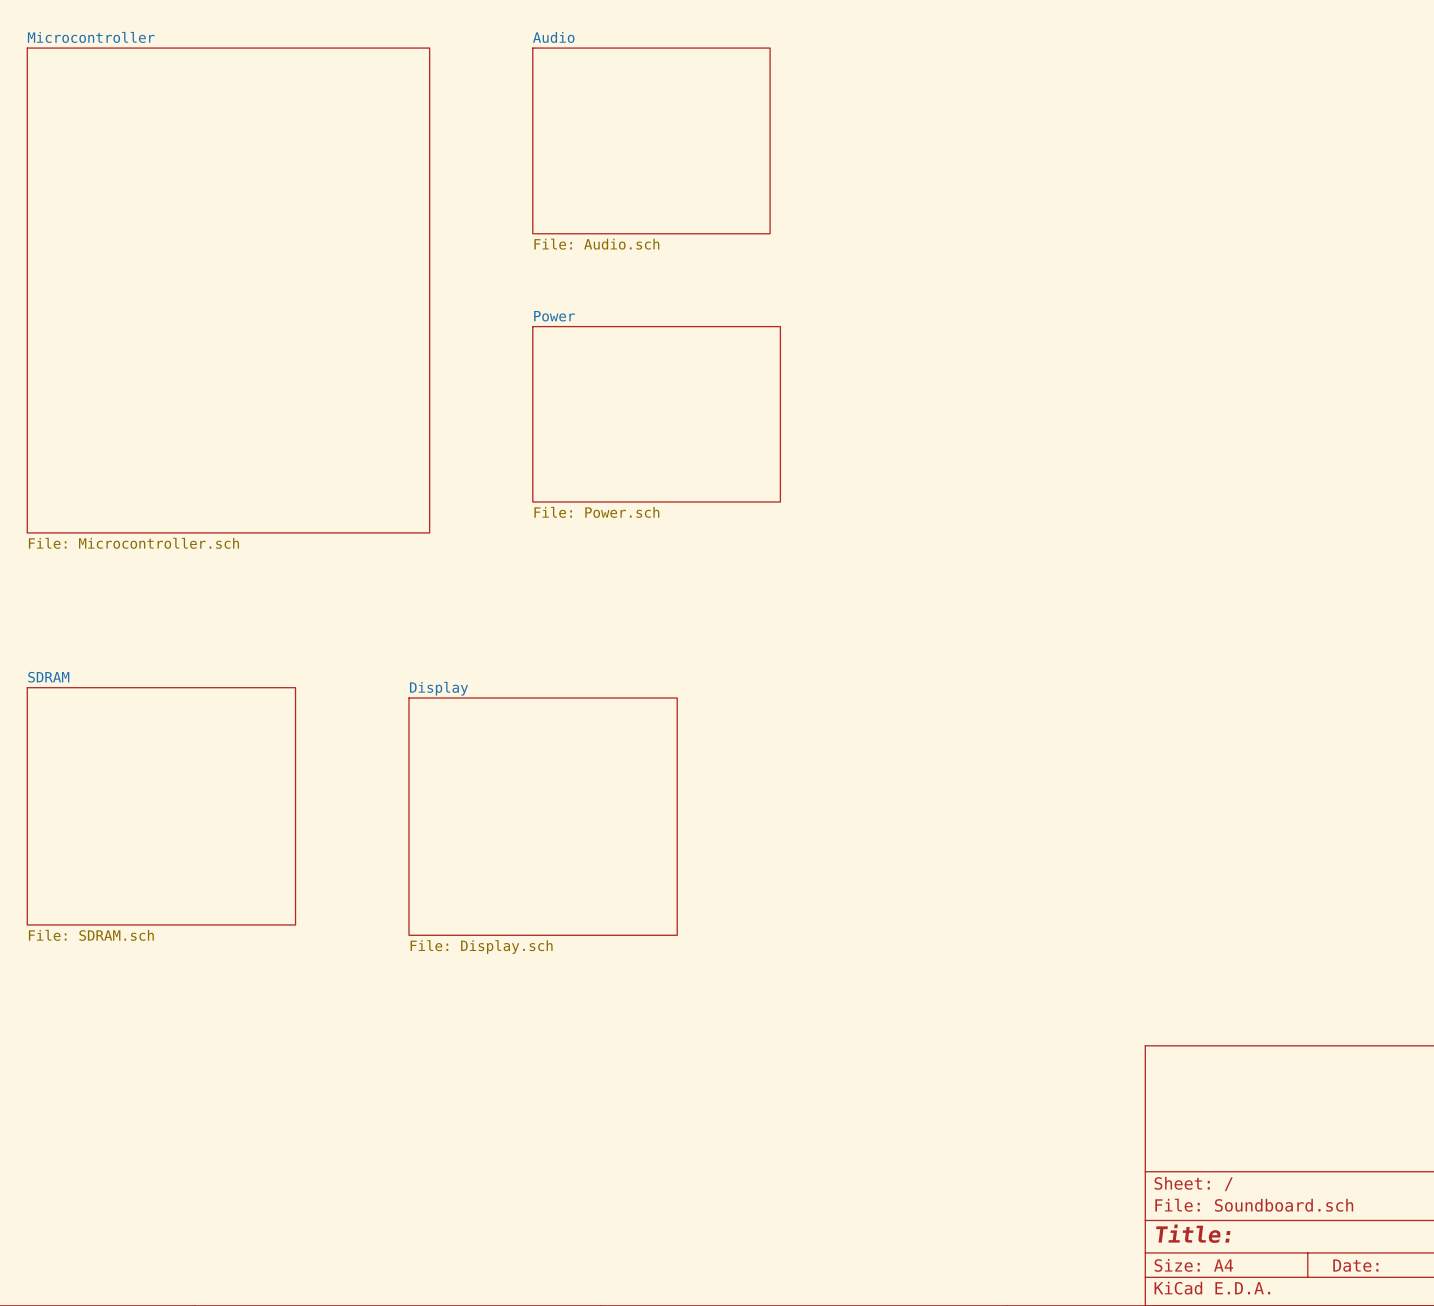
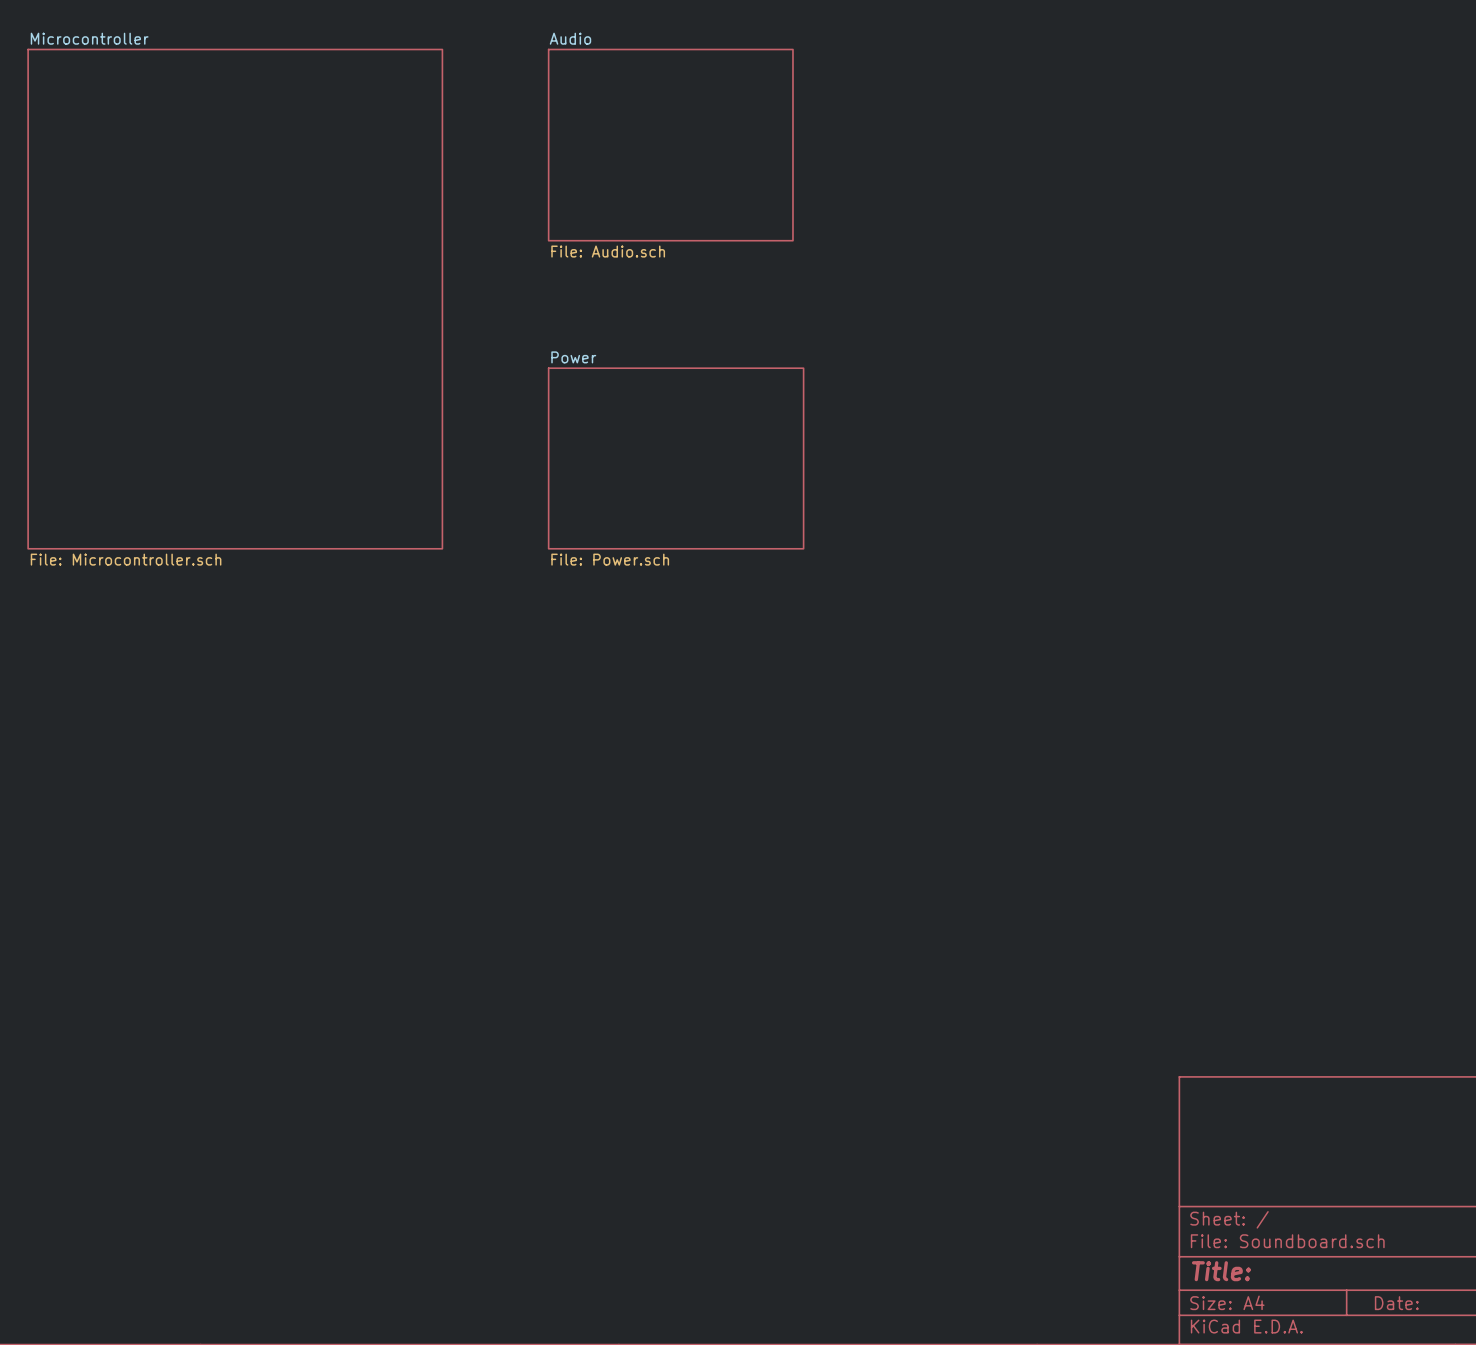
sheet Power position: (656, 414) -> (676, 458)
sheet SDRAM: File: SDRAM.sch (161, 806) -> none
sheet Display: File: Display.sch (543, 816) -> none

